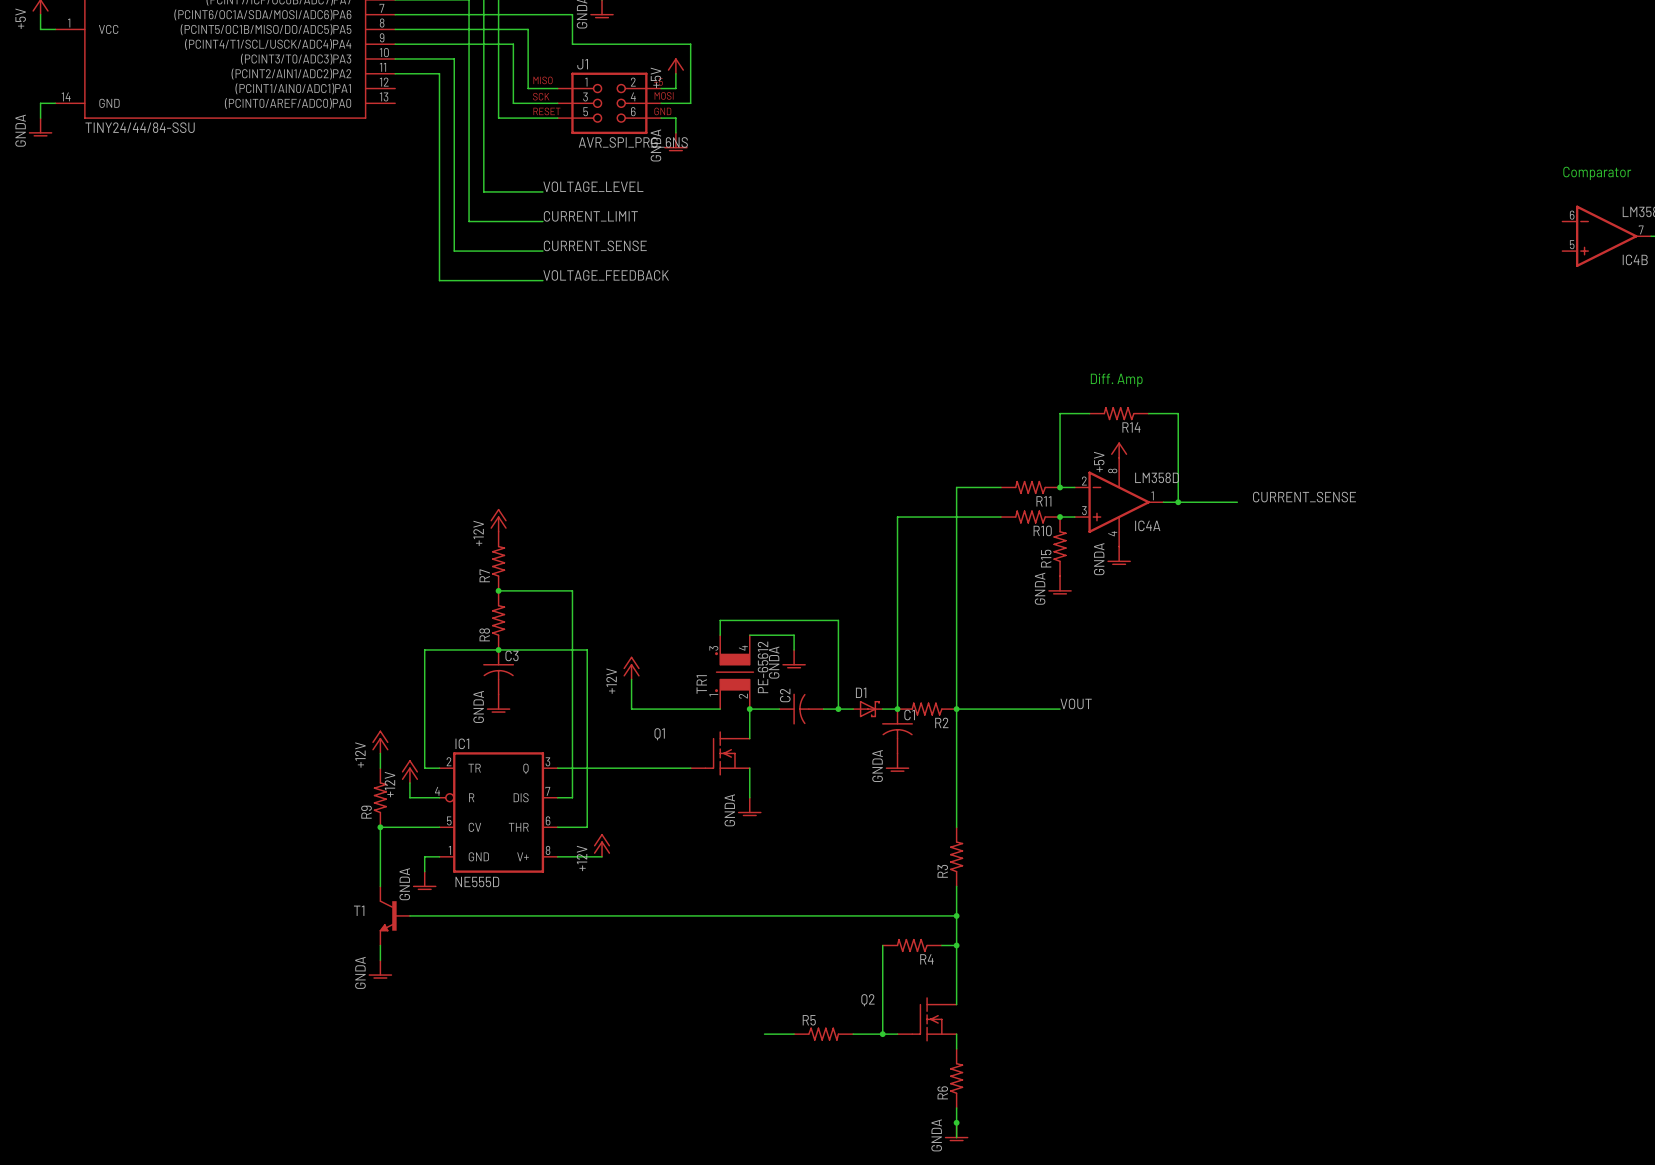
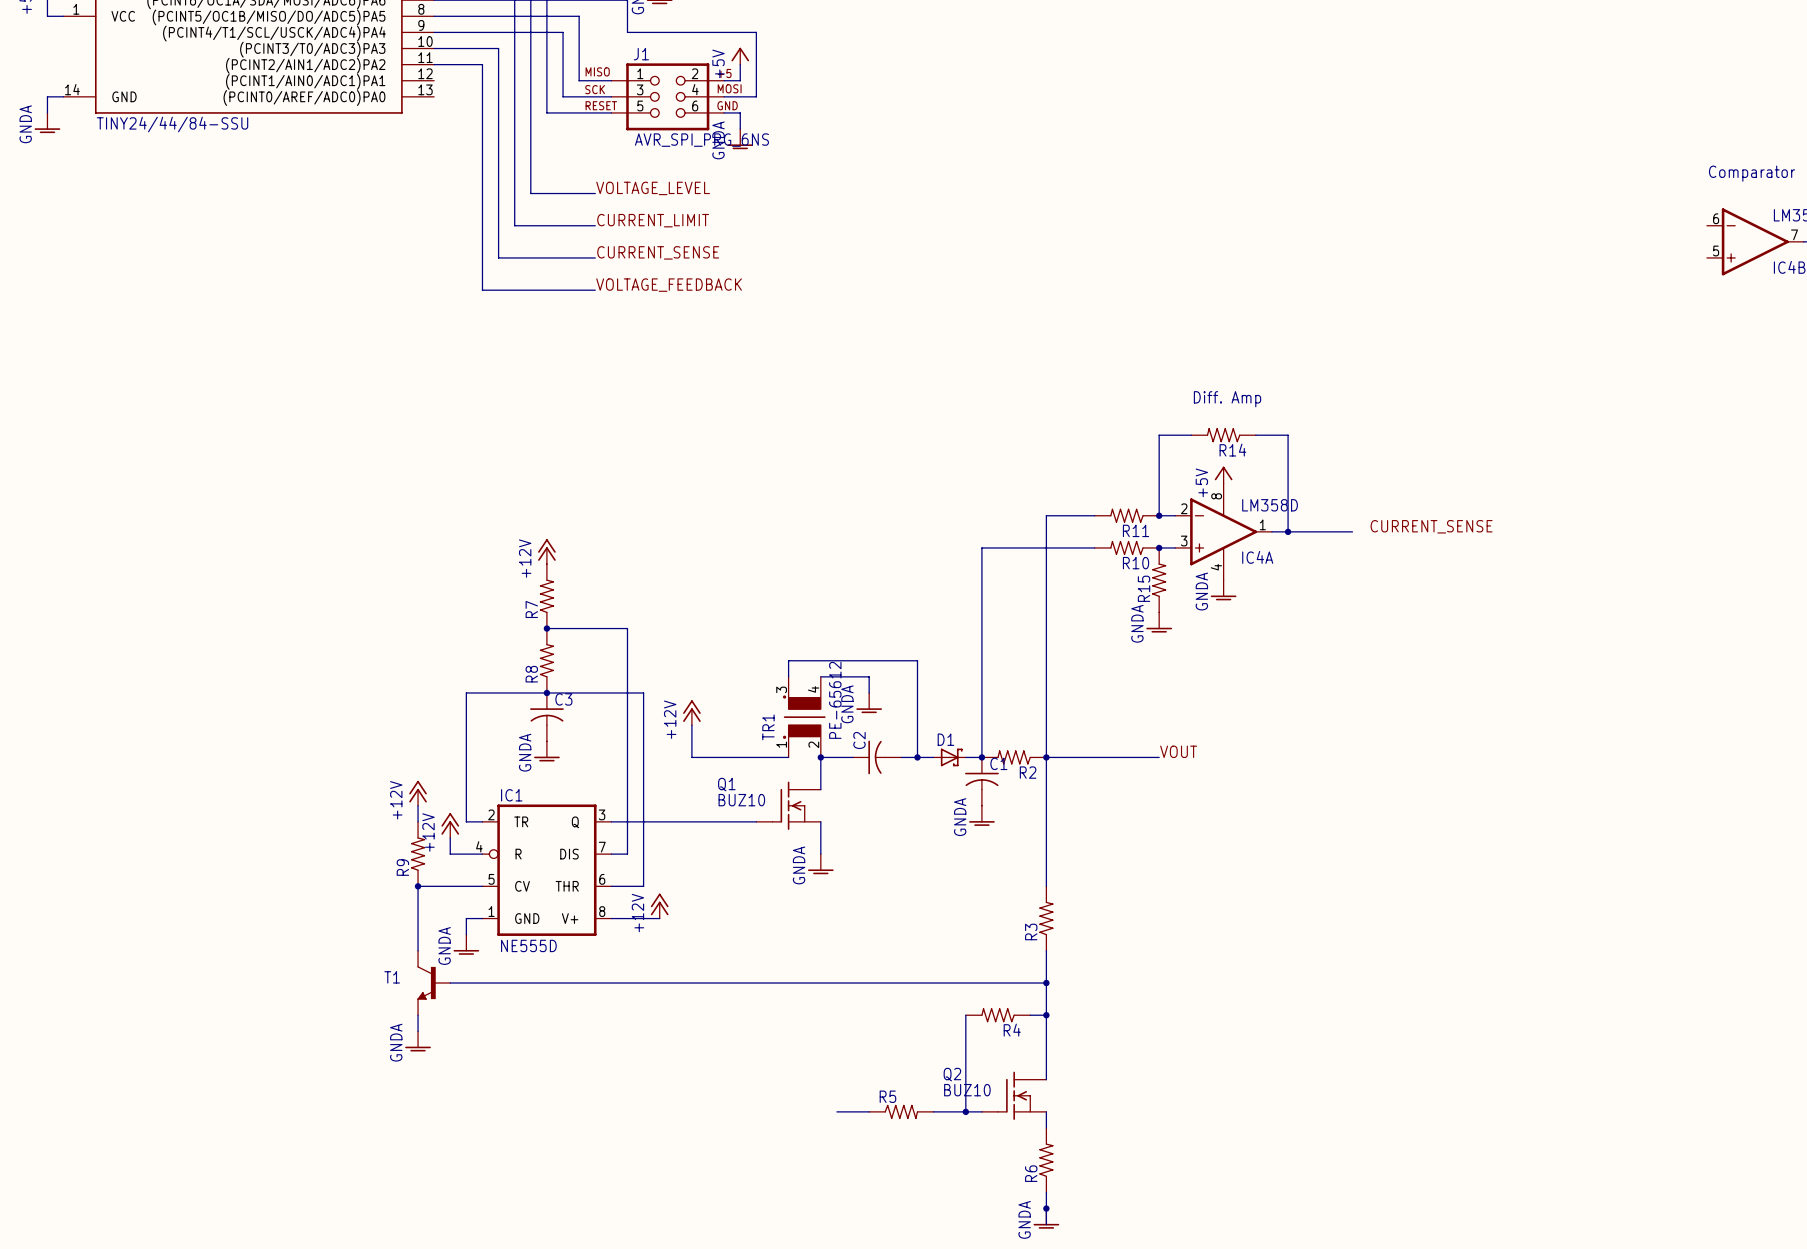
Q1 value: none -> BUZ10 (741, 800)
Q2 value: none -> BUZ10 (967, 1090)

